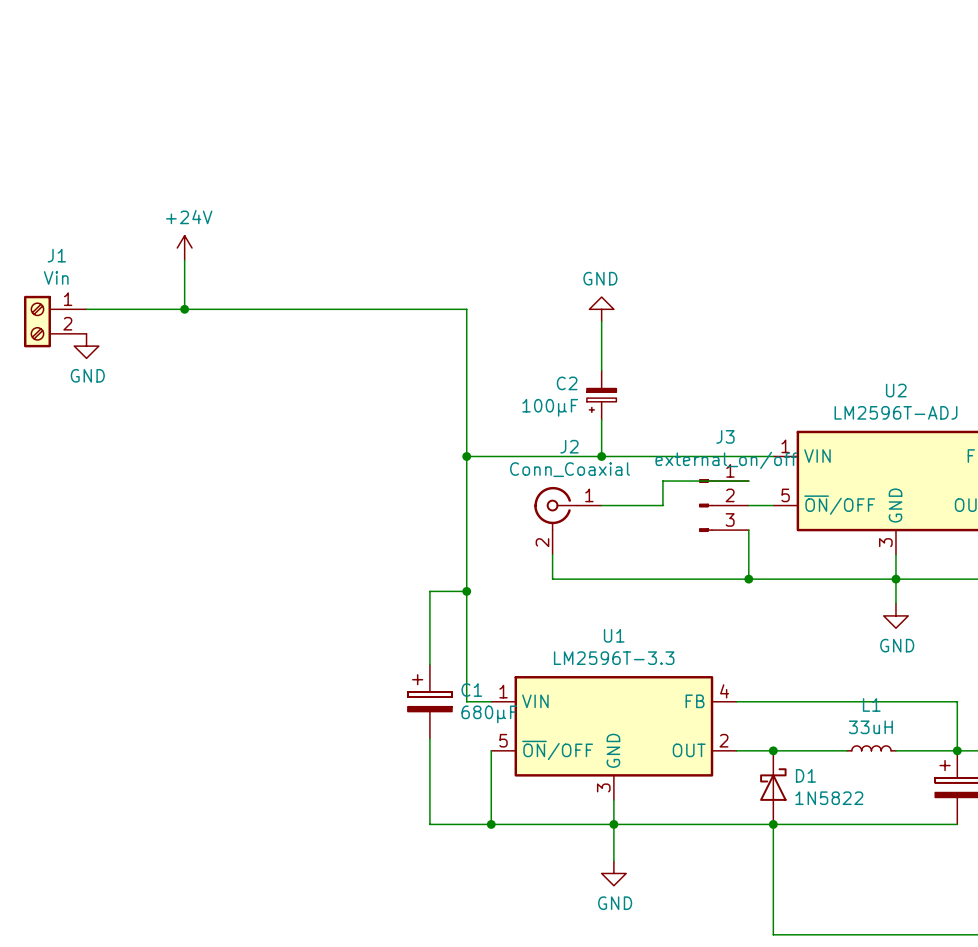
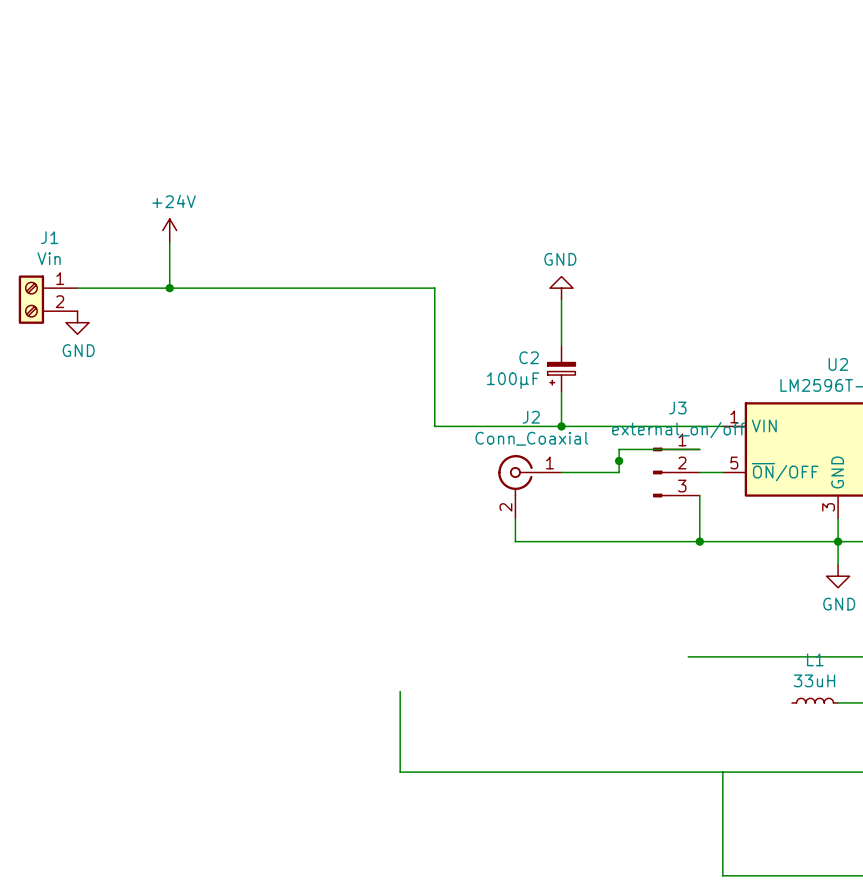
wire: (466, 456) (466, 701) (491, 701) -> none
junction: (466, 456) -> none
junction: none -> (619, 460)
wire: (466, 591) (429, 591) (429, 664) -> none
junction: (466, 591) -> none
C1: 680µF (429, 701) -> none
U1: LM2596T-3.3 (613, 737) -> none
wire: (491, 750) (491, 824) -> none
wire: (736, 750) (846, 750) -> none
junction: (773, 750) -> none
D1: 1N5822 (773, 787) -> none
wire: (613, 799) (613, 861) -> none
junction: (491, 824) -> none
junction: (613, 824) -> none
junction: (773, 824) -> none
power symbol: GND (613, 873) -> none

